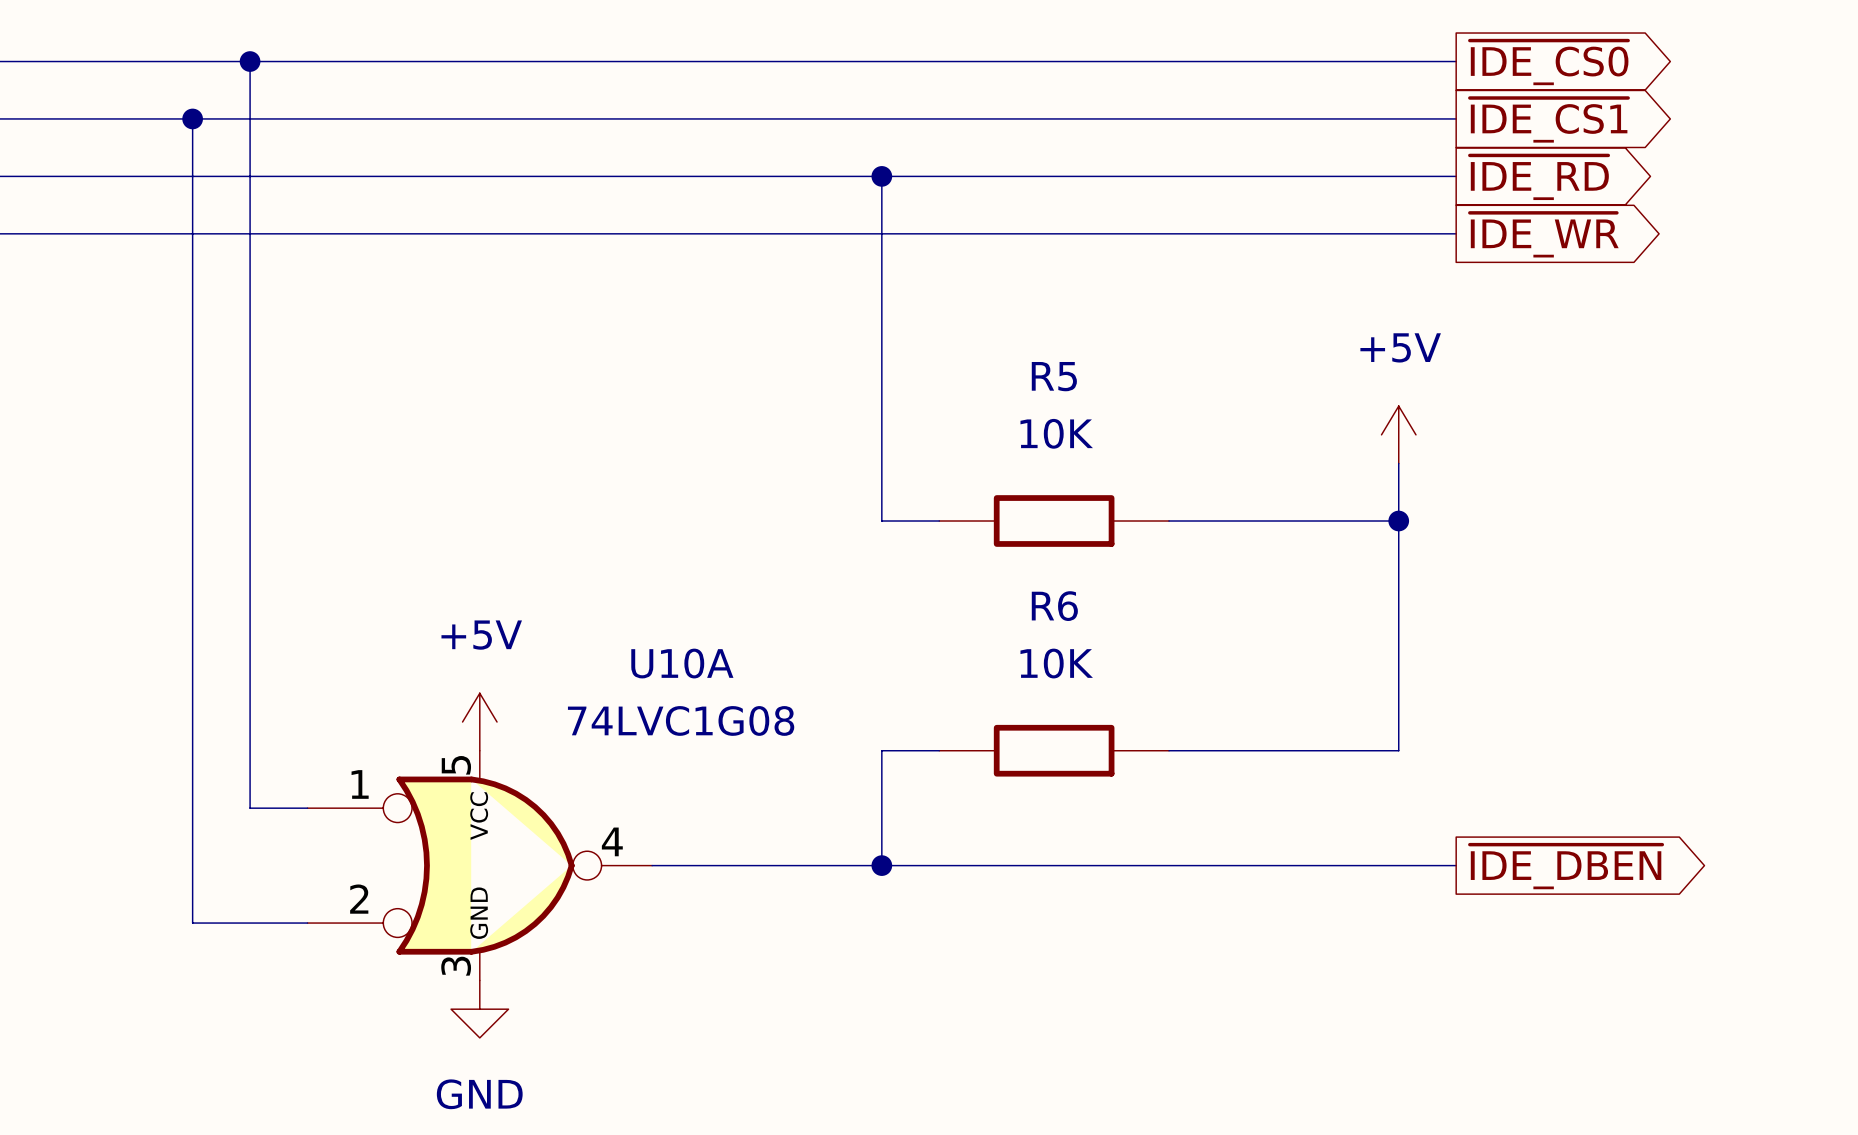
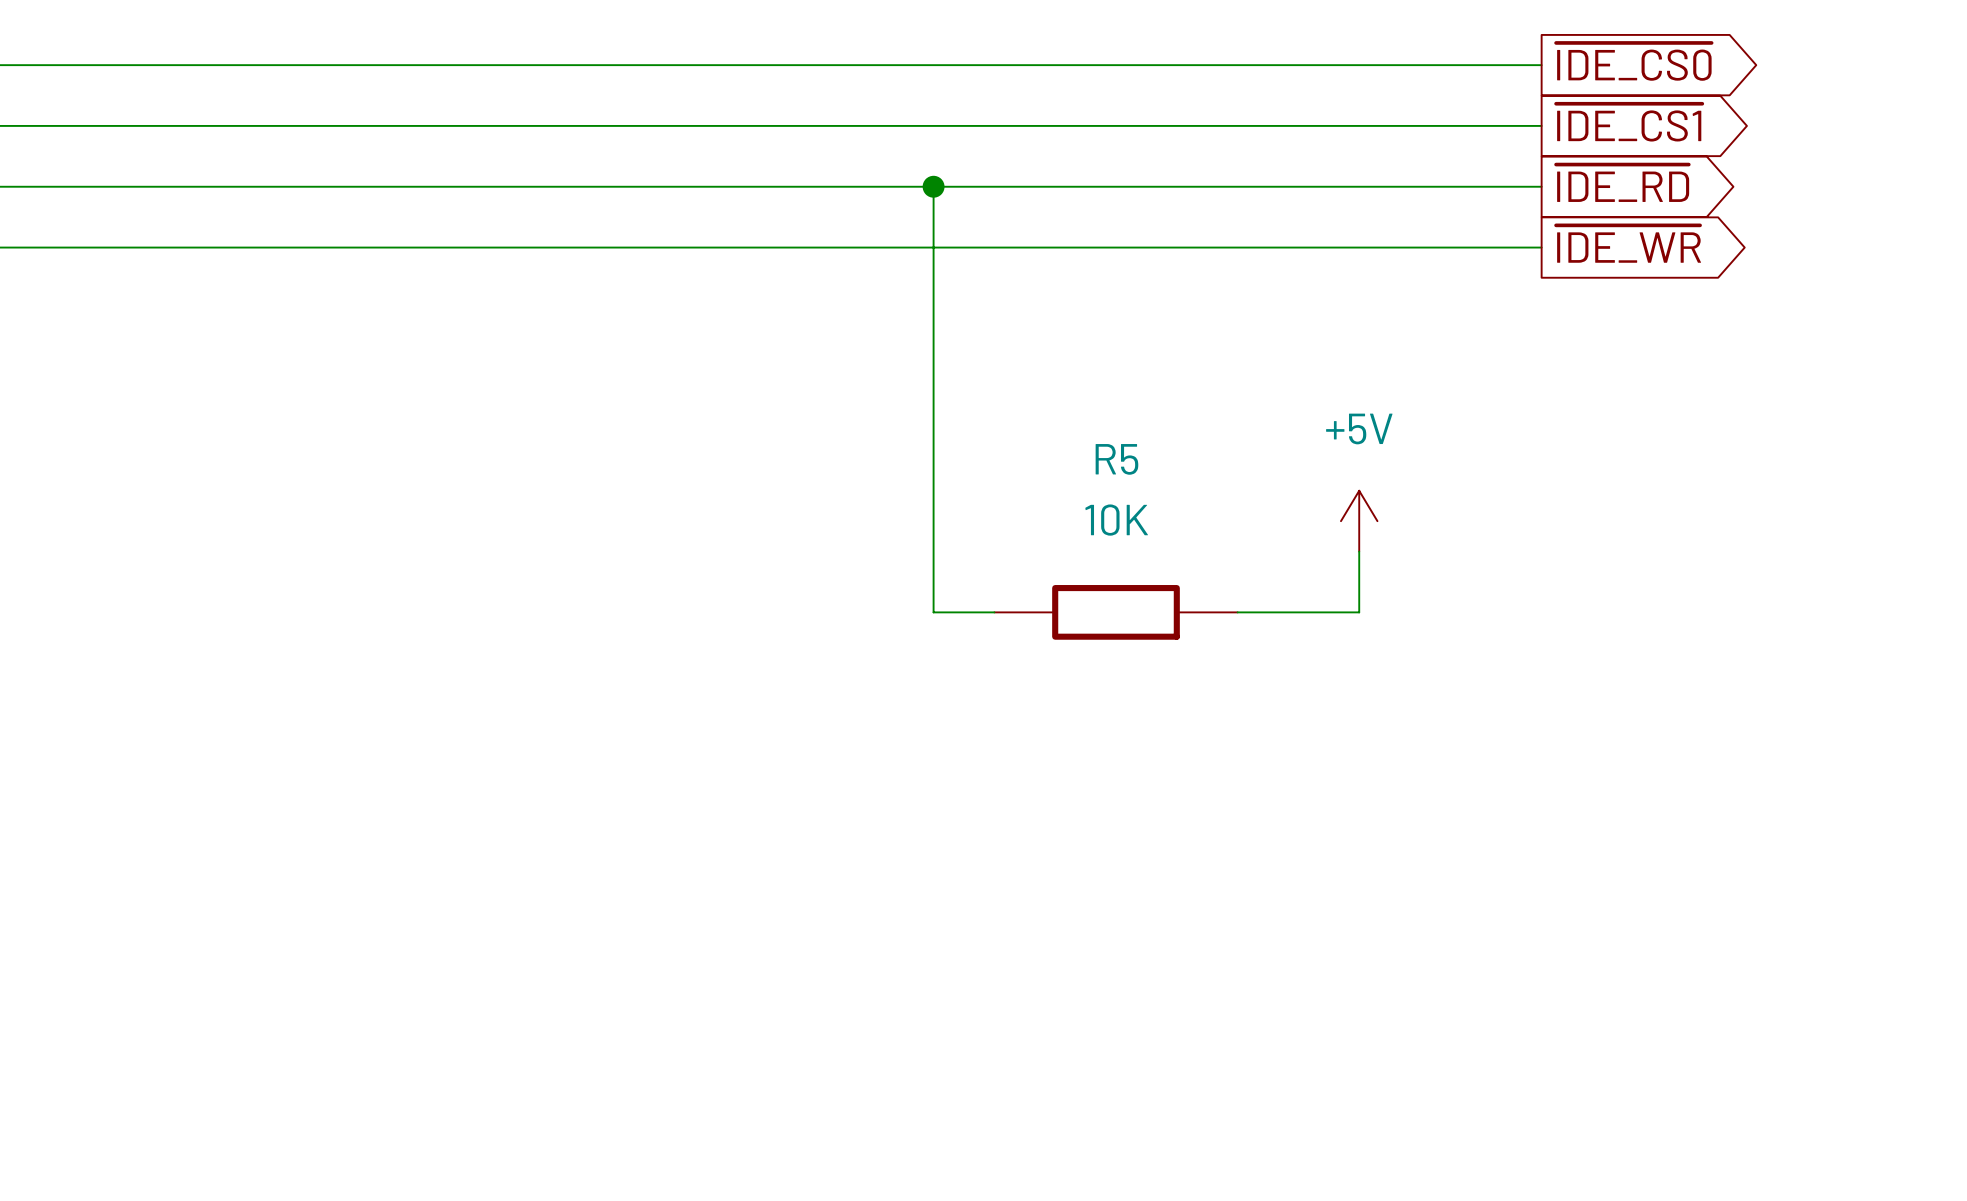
wire: (250, 61) (250, 808) (307, 808) -> none
junction: (250, 61) -> none
wire: (192, 118) (192, 923) (307, 923) -> none
junction: (192, 118) -> none
power symbol position: +5V (1398, 434) -> +5V (1359, 521)
wire: (1398, 463) (1398, 750) (1169, 750) -> none
wire: (881, 521) (939, 521) -> (933, 551) (933, 612) (994, 612)
R5 position: (1054, 521) -> (1116, 612)
wire: (1169, 521) (1398, 521) -> none
wire: none -> (1359, 551) (1359, 612) (1237, 612)
junction: (1398, 521) -> none
power symbol: +5V (479, 722) -> none
wire: (939, 750) (881, 750) (881, 865) -> none
R6: 10K (1054, 750) -> none
U10A: 74LVC1G08 (479, 865) -> none
part: (479, 865) -> none
wire: (652, 865) (1456, 865) -> none
junction: (881, 865) -> none
global label: ~{IDE_DBEN} (1566, 866) -> none
power symbol: GND (479, 1009) -> none

